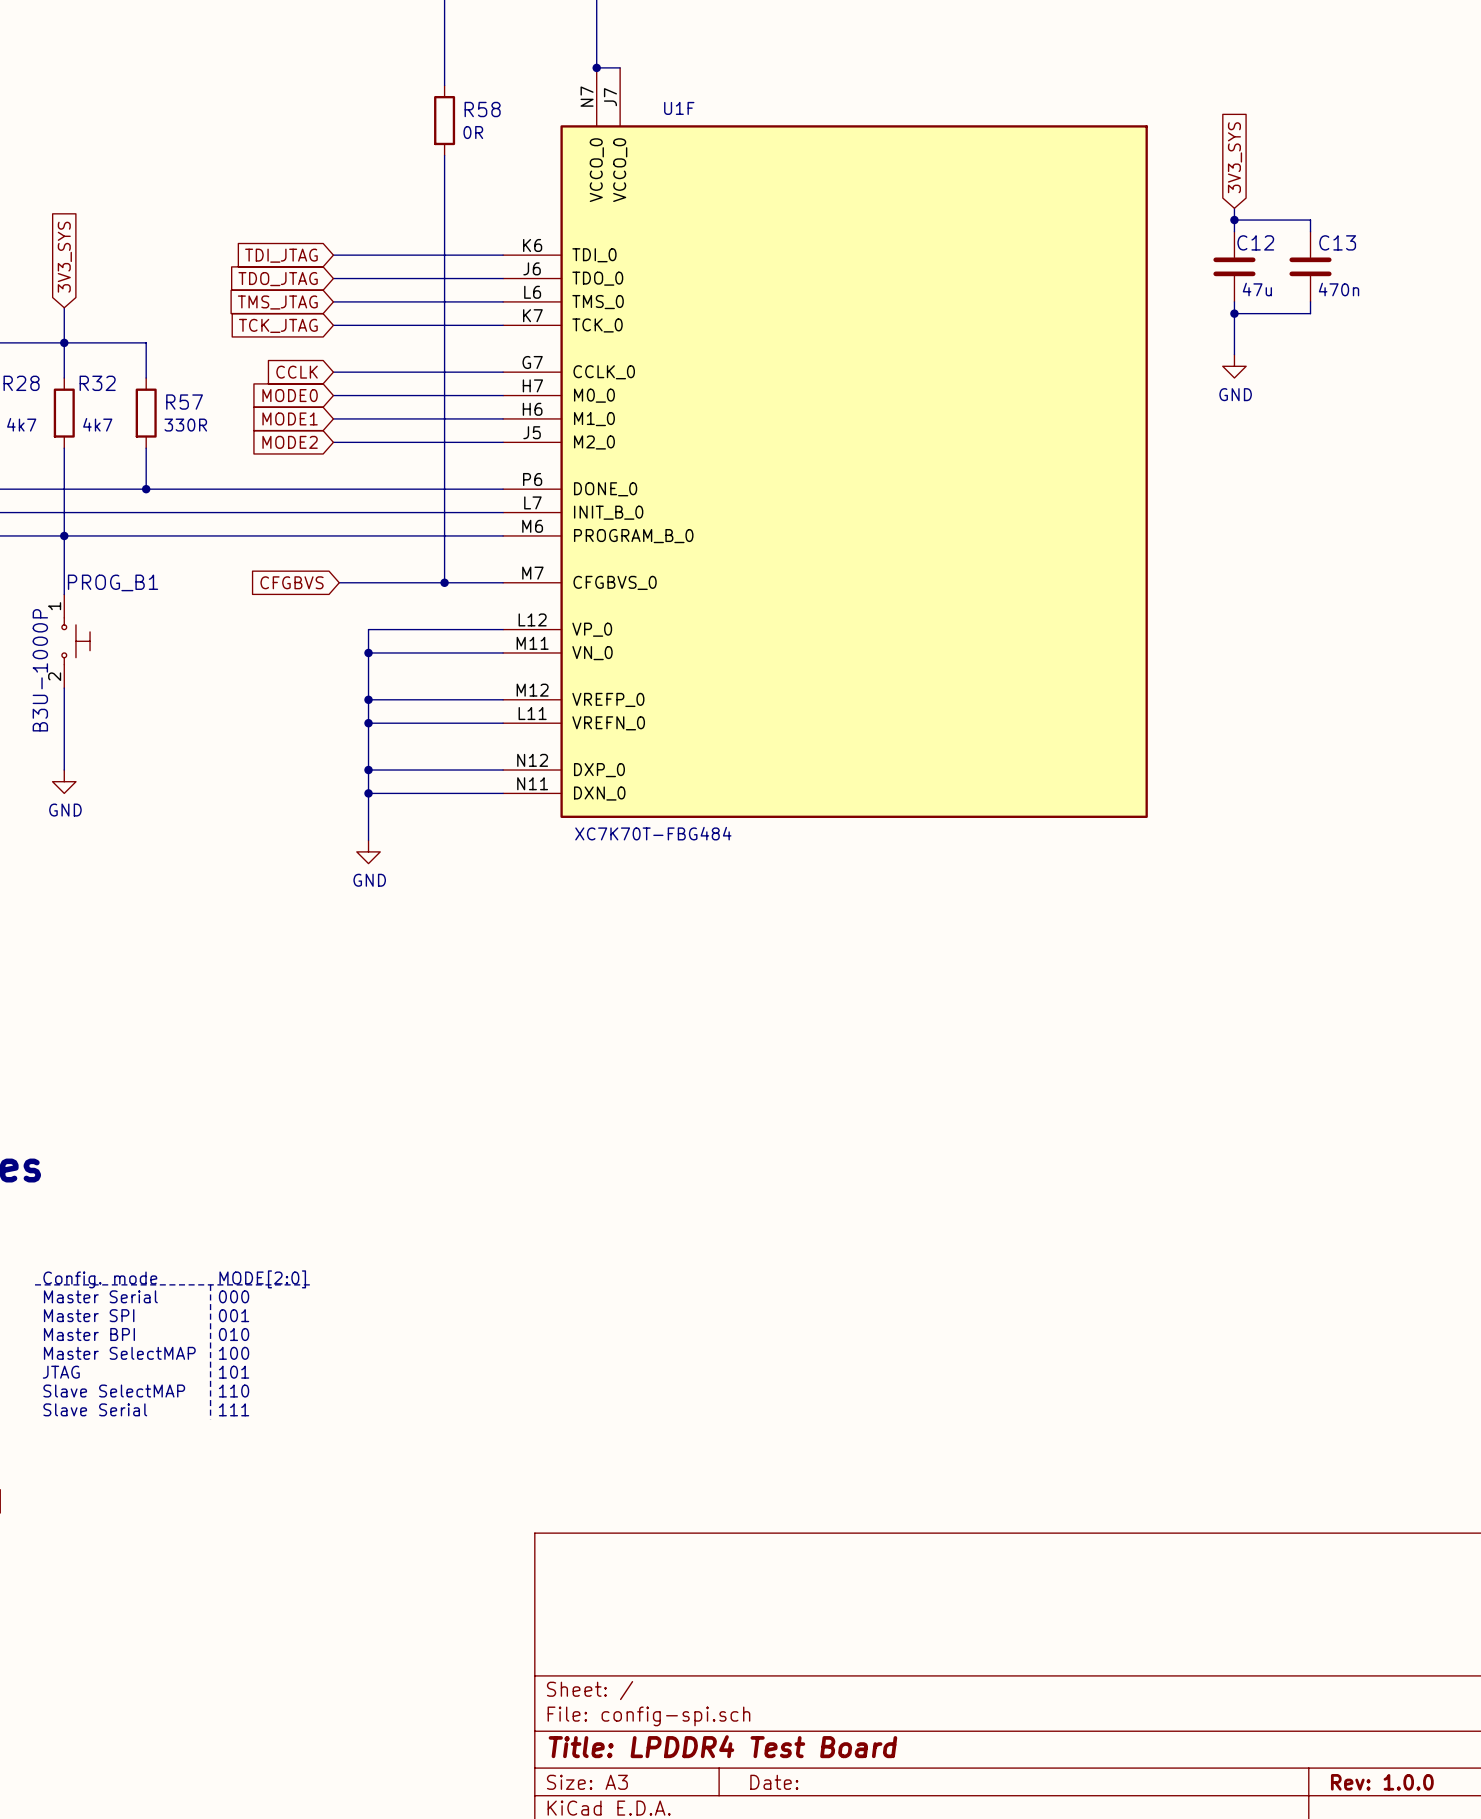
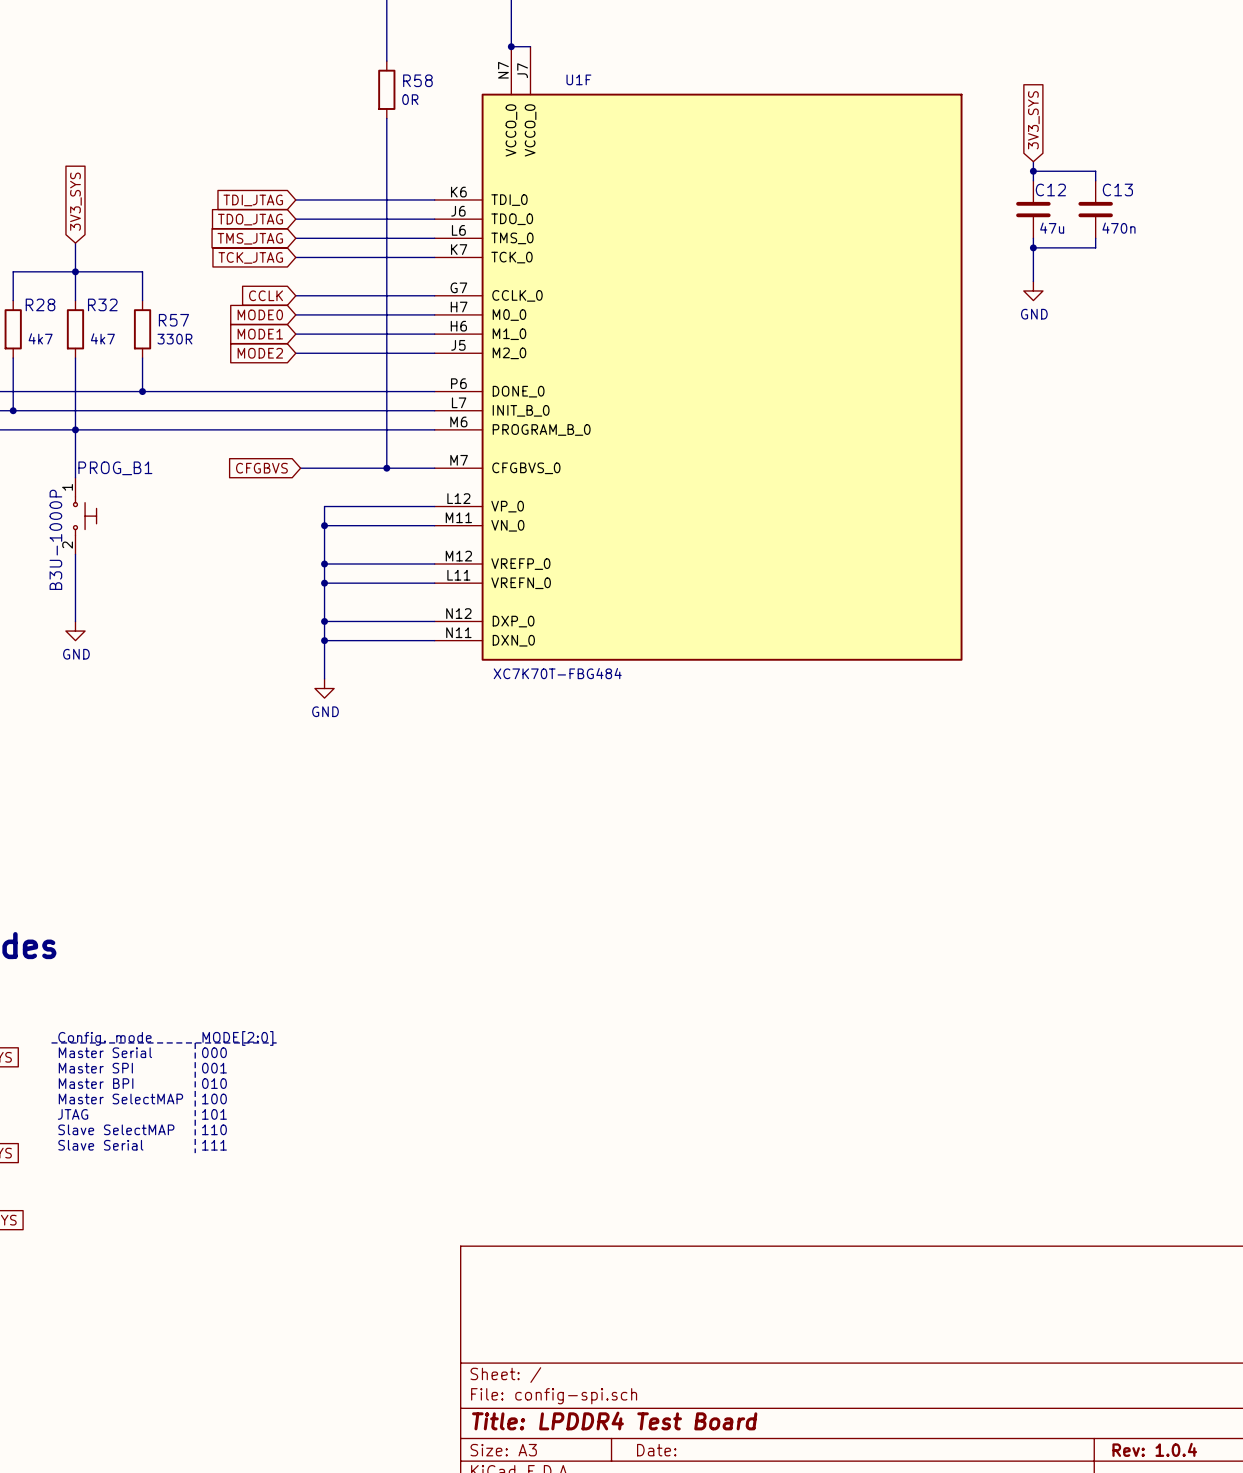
title block: Rev: 1.0.0 (1382, 1782) -> Rev: 1.0.4 (1154, 1449)

